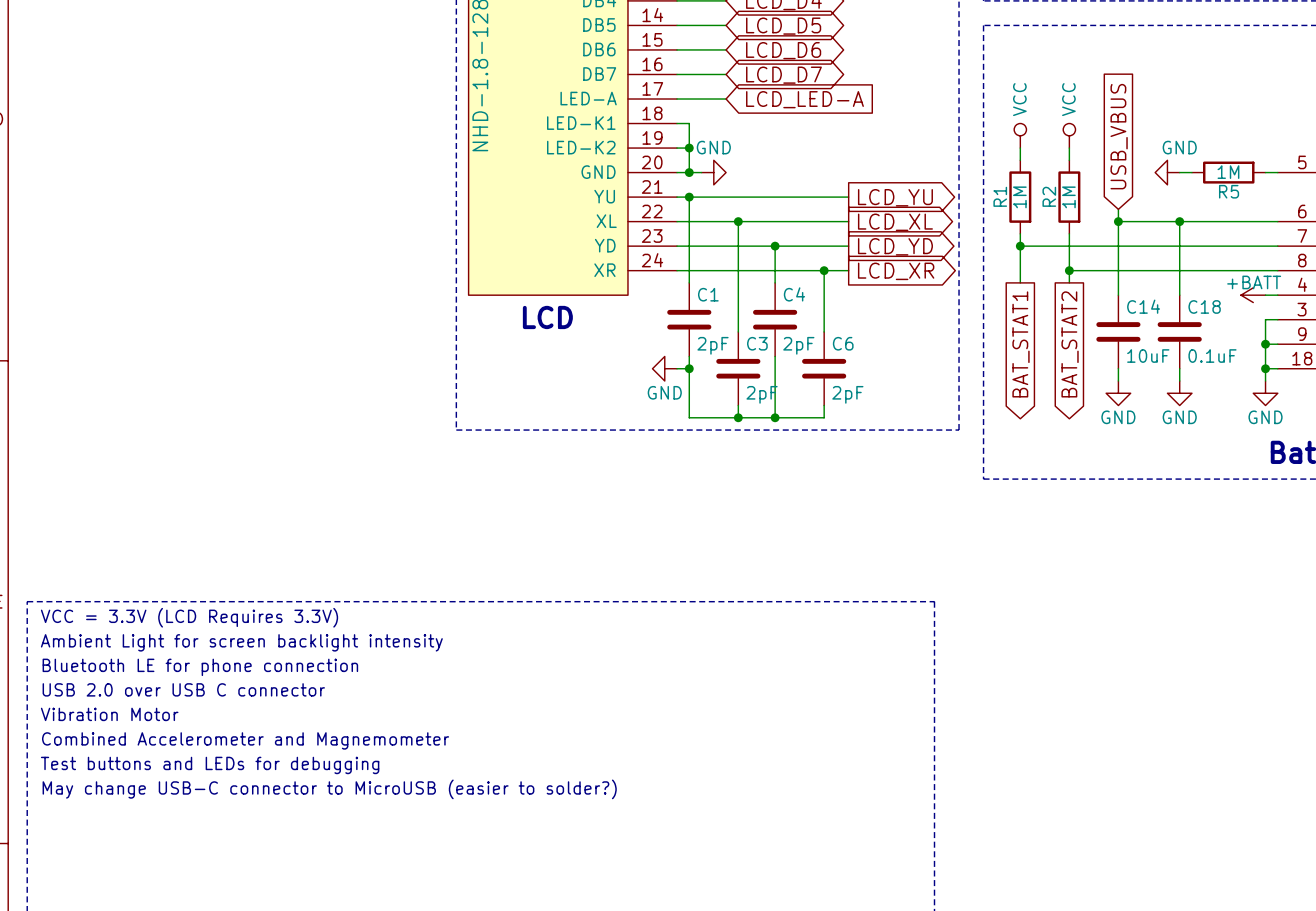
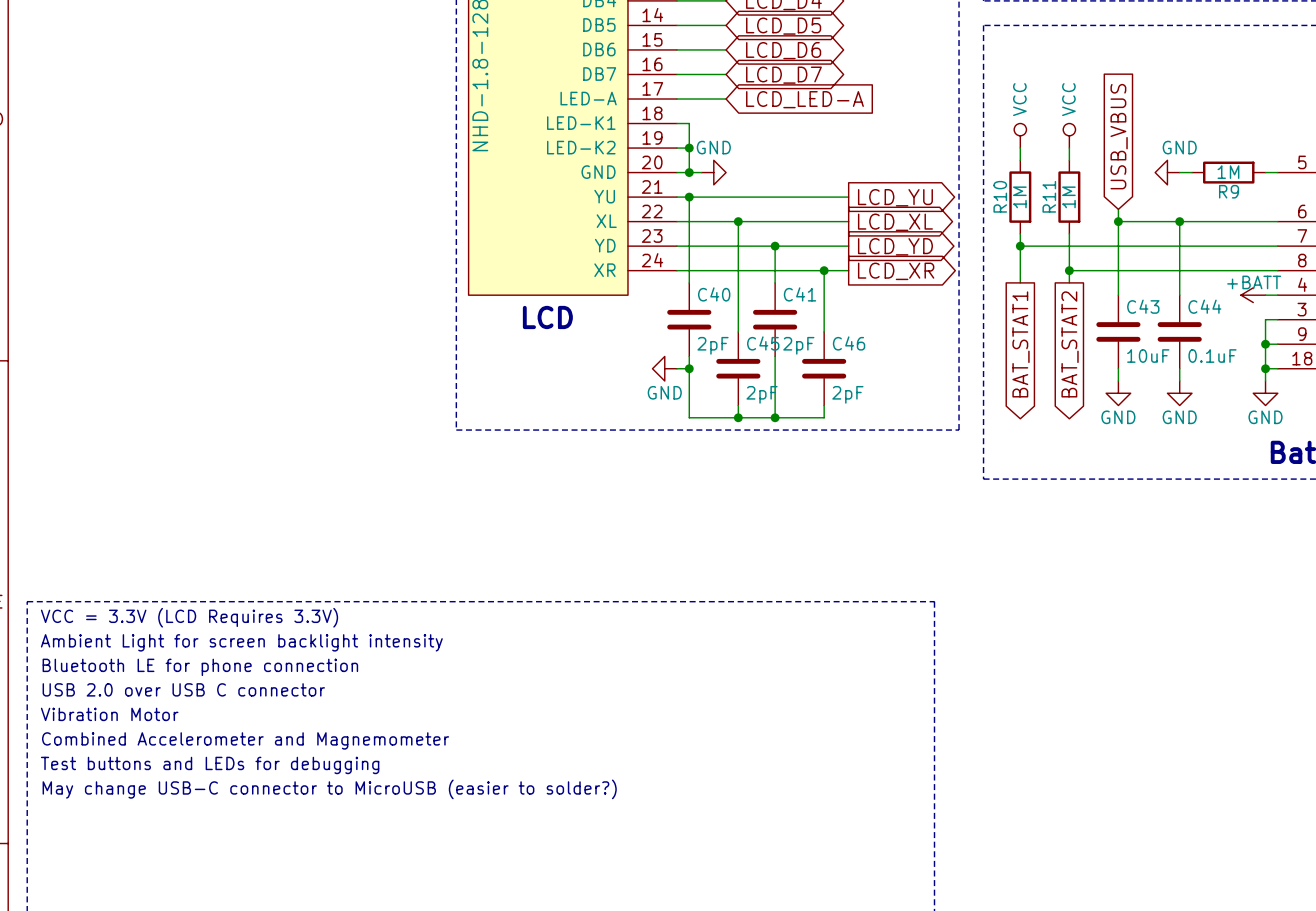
R5 name: R5 (1229, 191) -> R9 (1229, 191)
R1 name: R1 (1000, 196) -> R10 (1000, 196)
R2 name: R2 (1049, 196) -> R11 (1049, 196)
C1 name: C1 (708, 294) -> C40 (714, 294)
C4 name: C4 (794, 294) -> C41 (800, 294)
C14 name: C14 (1143, 306) -> C43 (1143, 306)
C18 name: C18 (1204, 306) -> C44 (1204, 306)
C3 name: C3 (757, 343) -> C45 (763, 343)
C6 name: C6 (843, 343) -> C46 (849, 343)

